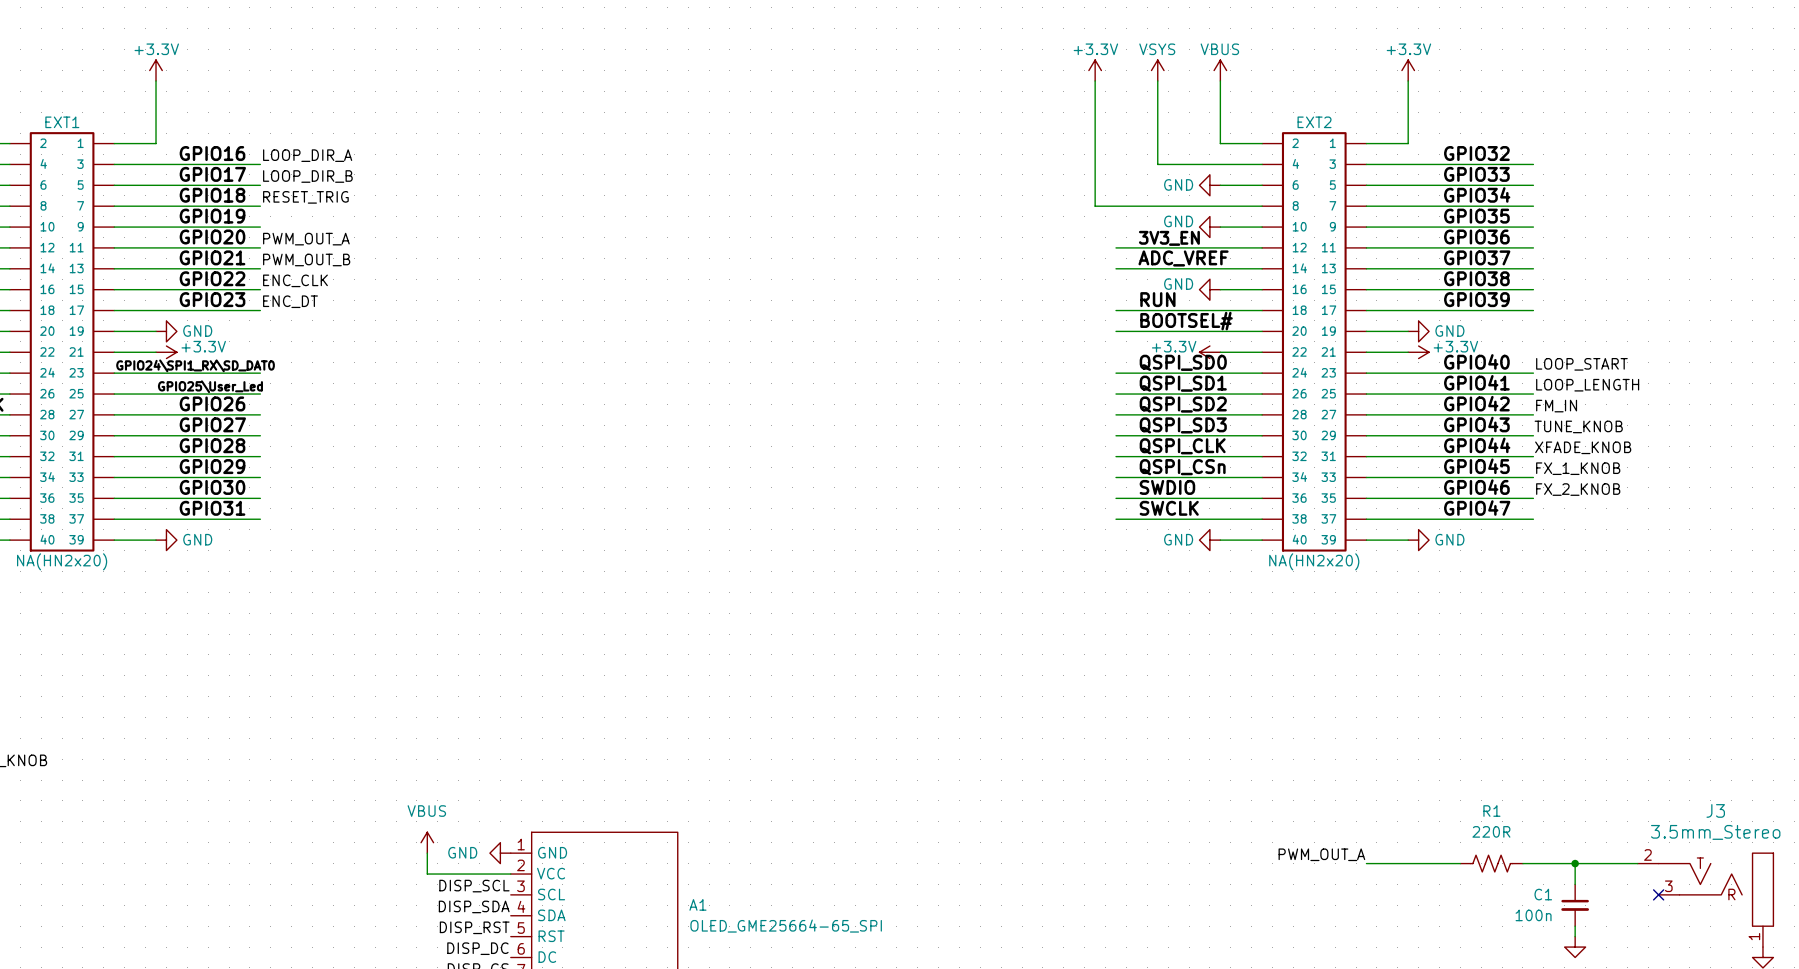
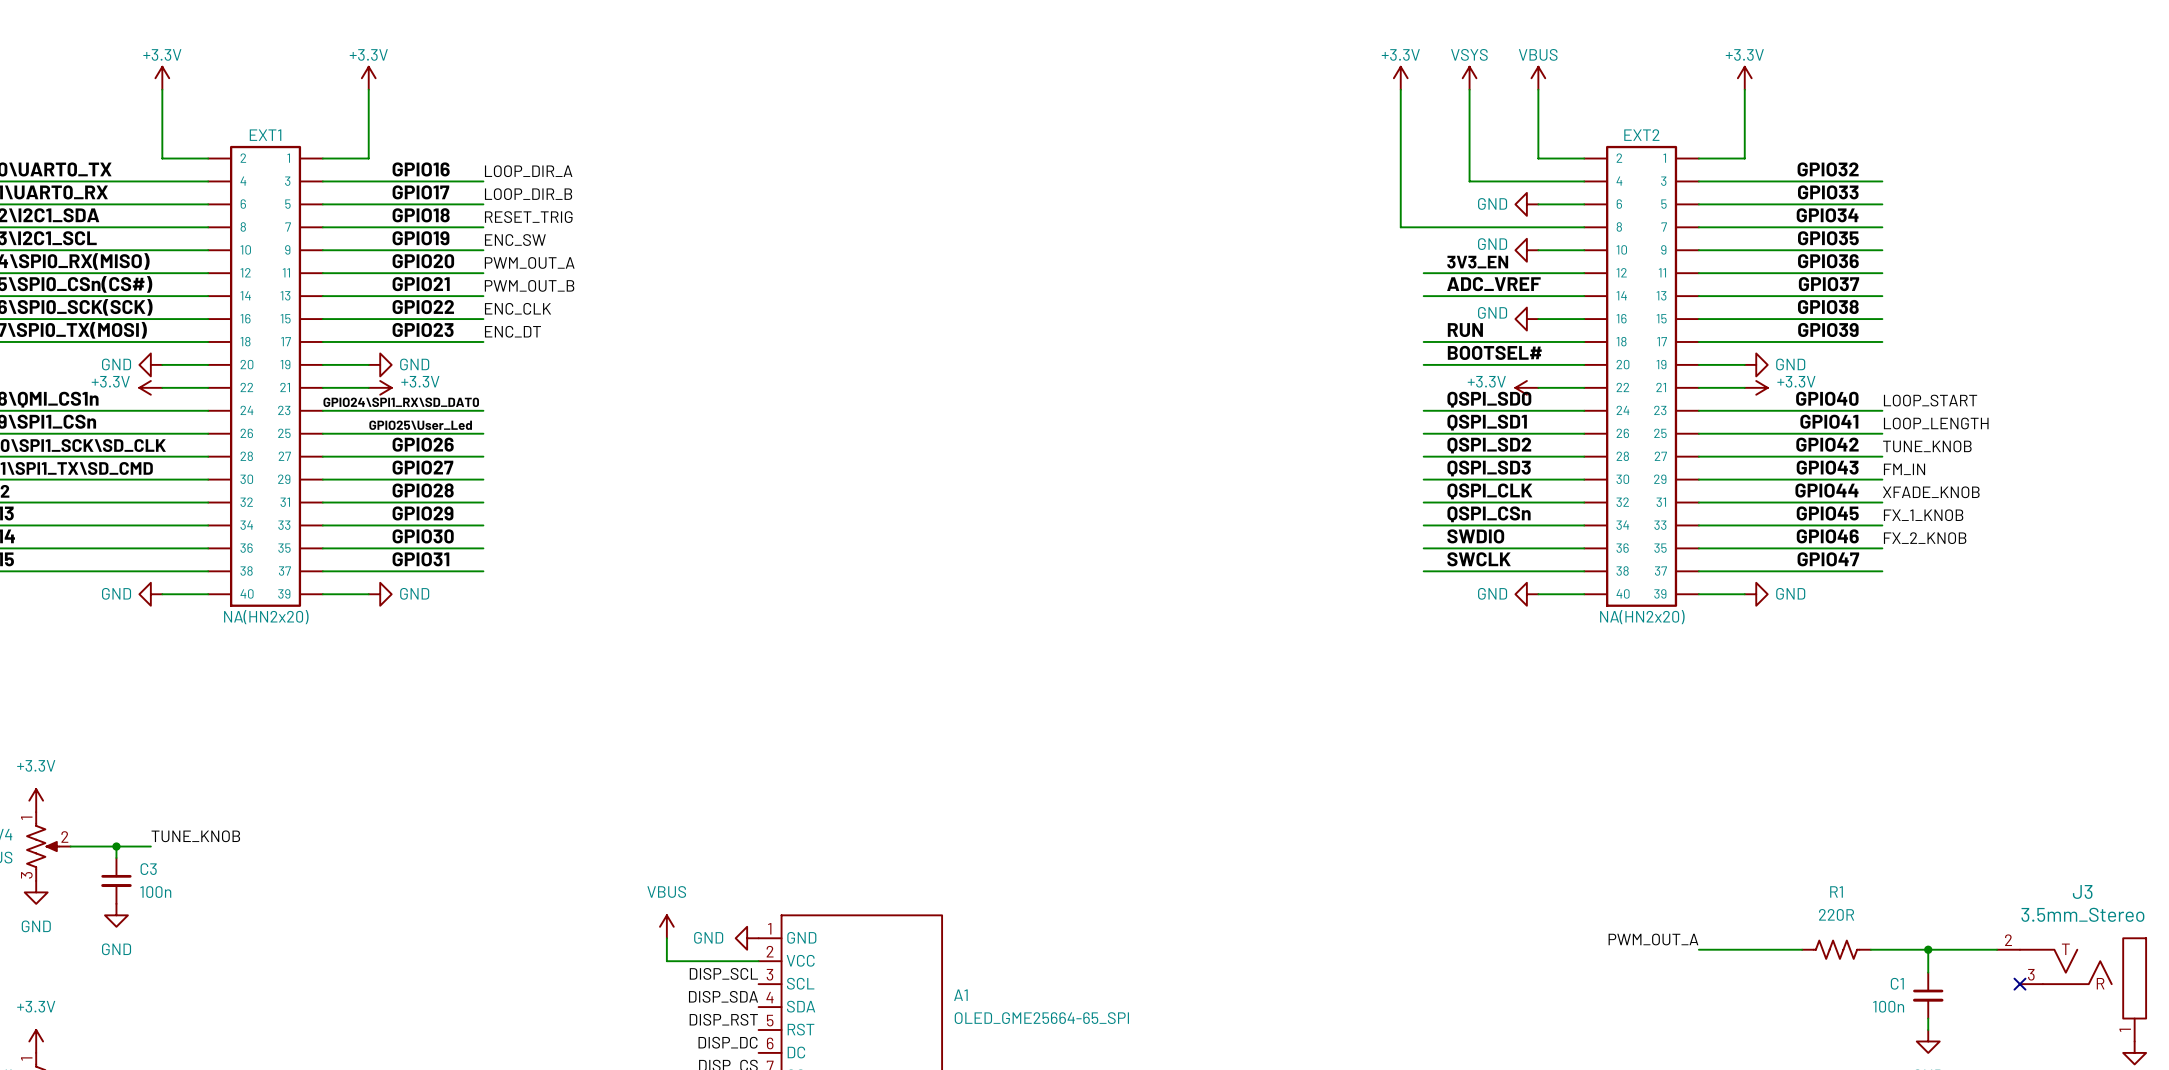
label: none -> ENC_SW (515, 240)
label: FM_IN (1556, 406) -> TUNE_KNOB (1927, 446)
label: TUNE_KNOB (1578, 426) -> FM_IN (1904, 469)

